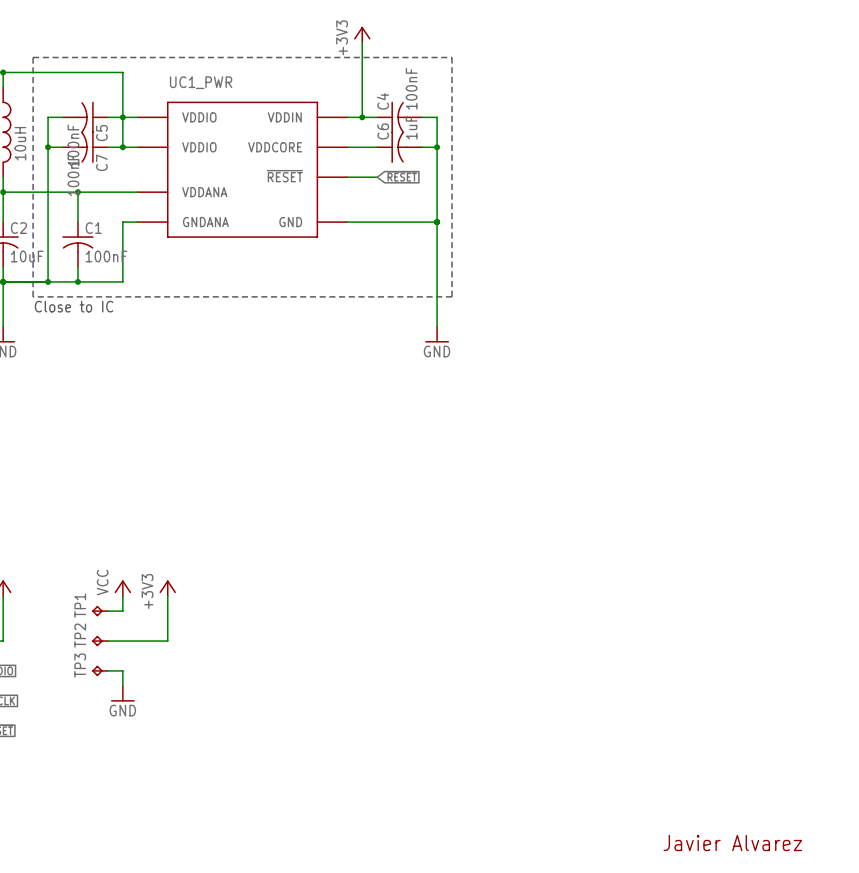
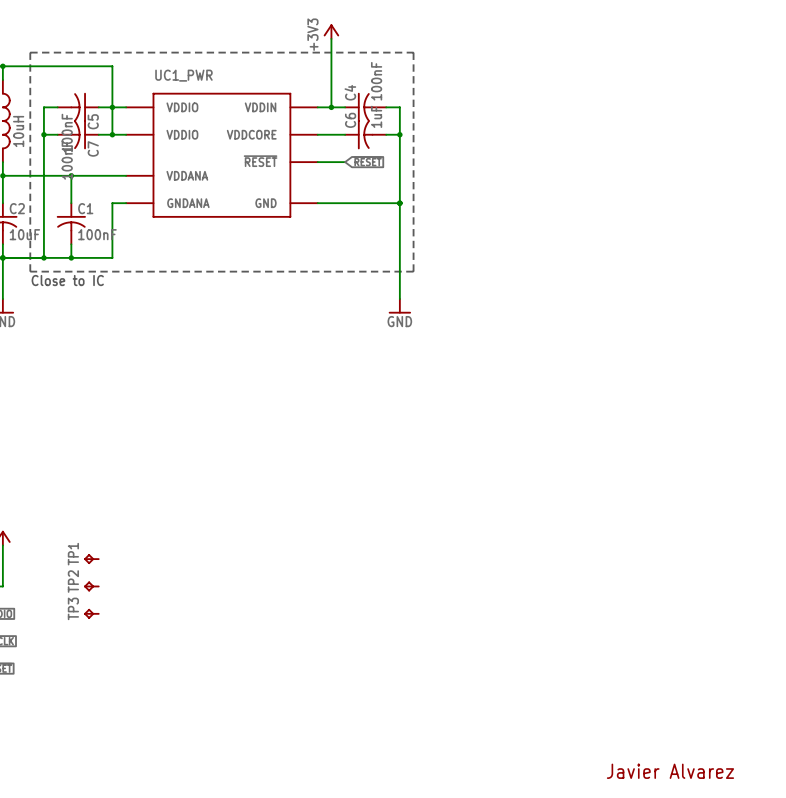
power symbol: VCC (122, 588) -> none
power symbol: +3V3 (167, 588) -> none
wire: (122, 596) (122, 611) (107, 611) -> none
wire: (167, 596) (167, 641) (107, 641) -> none
wire: (107, 670) (122, 670) (122, 685) -> none
power symbol: GND (122, 693) -> none

